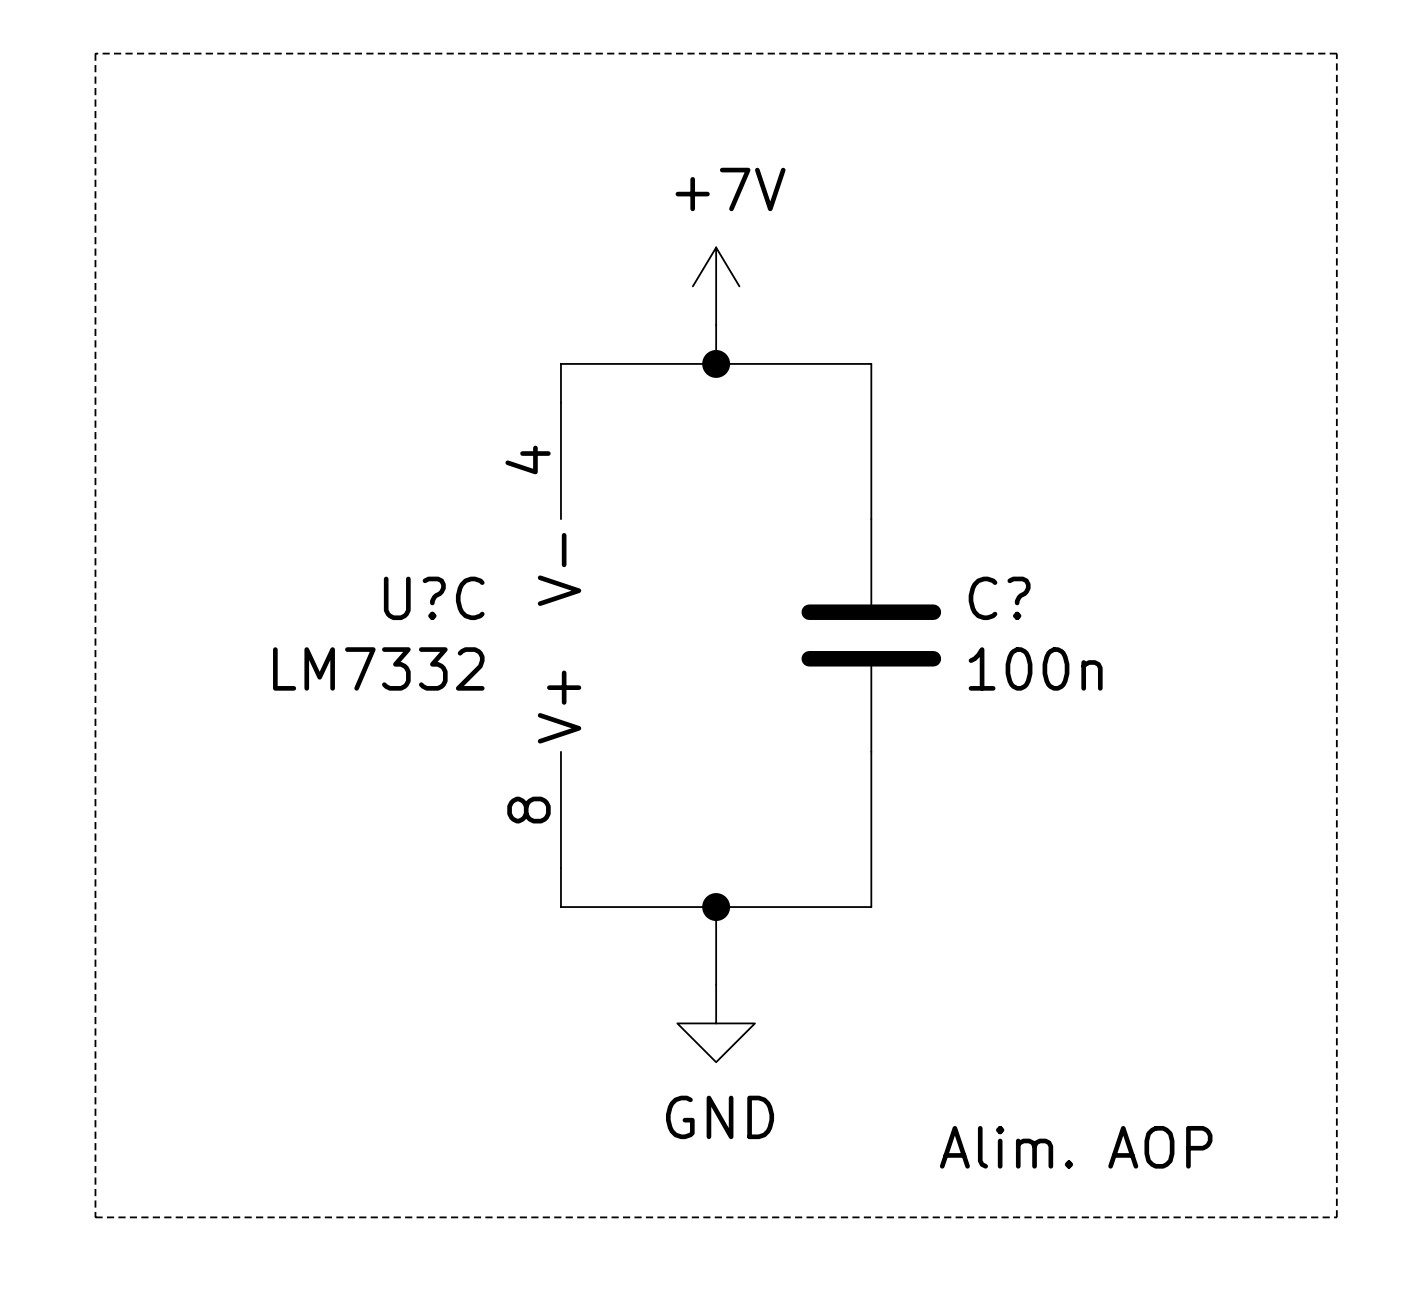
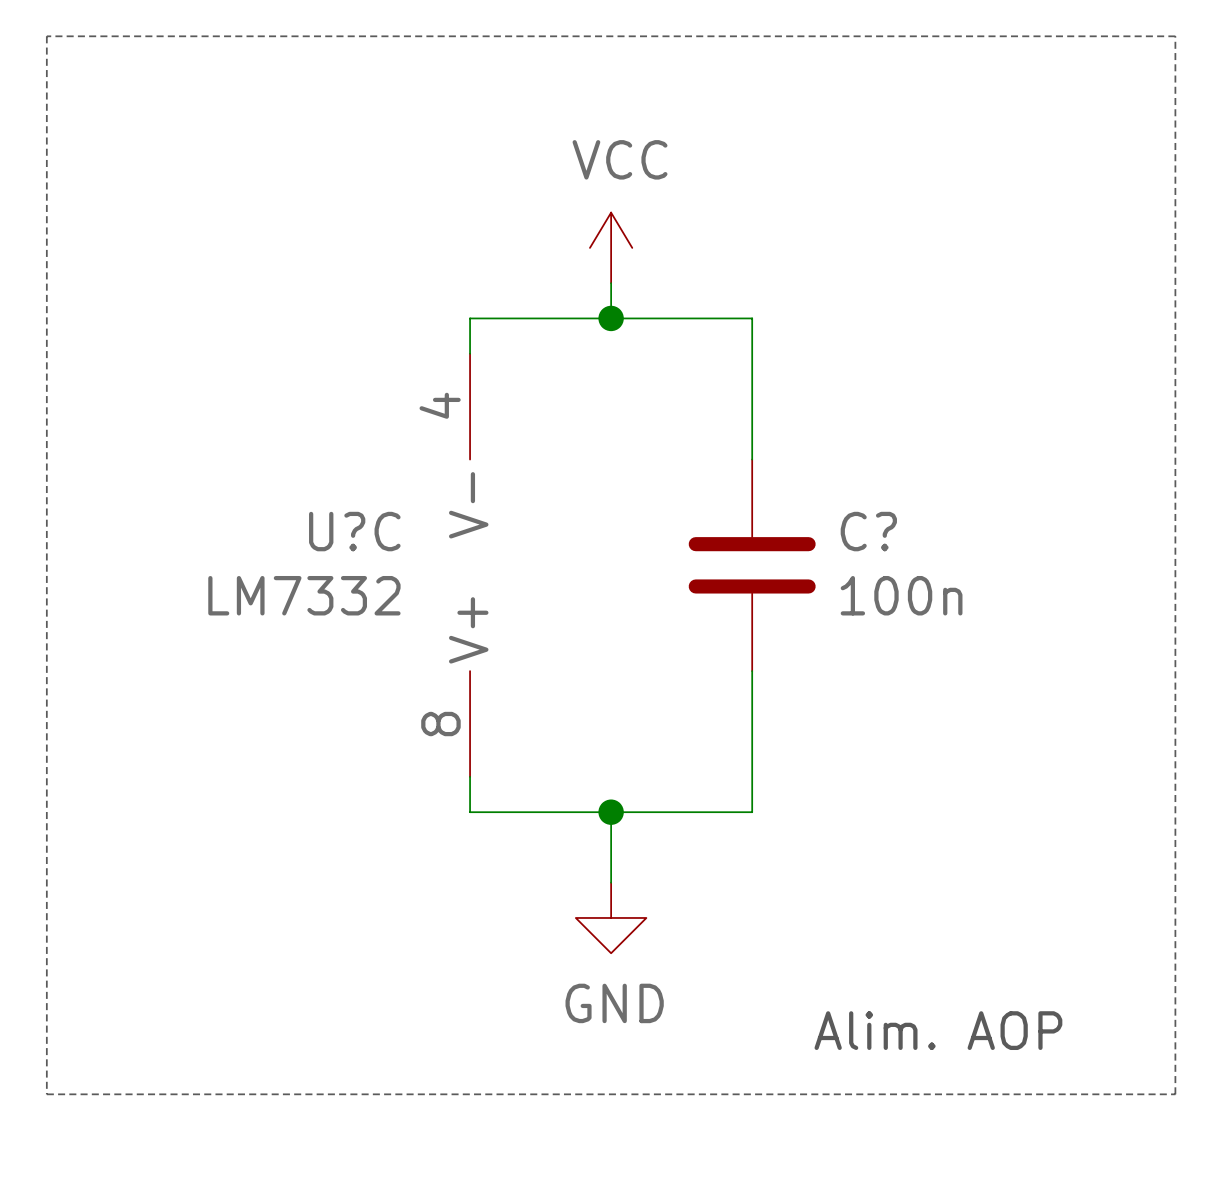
power symbol: +7V (716, 286) -> VCC (611, 247)

